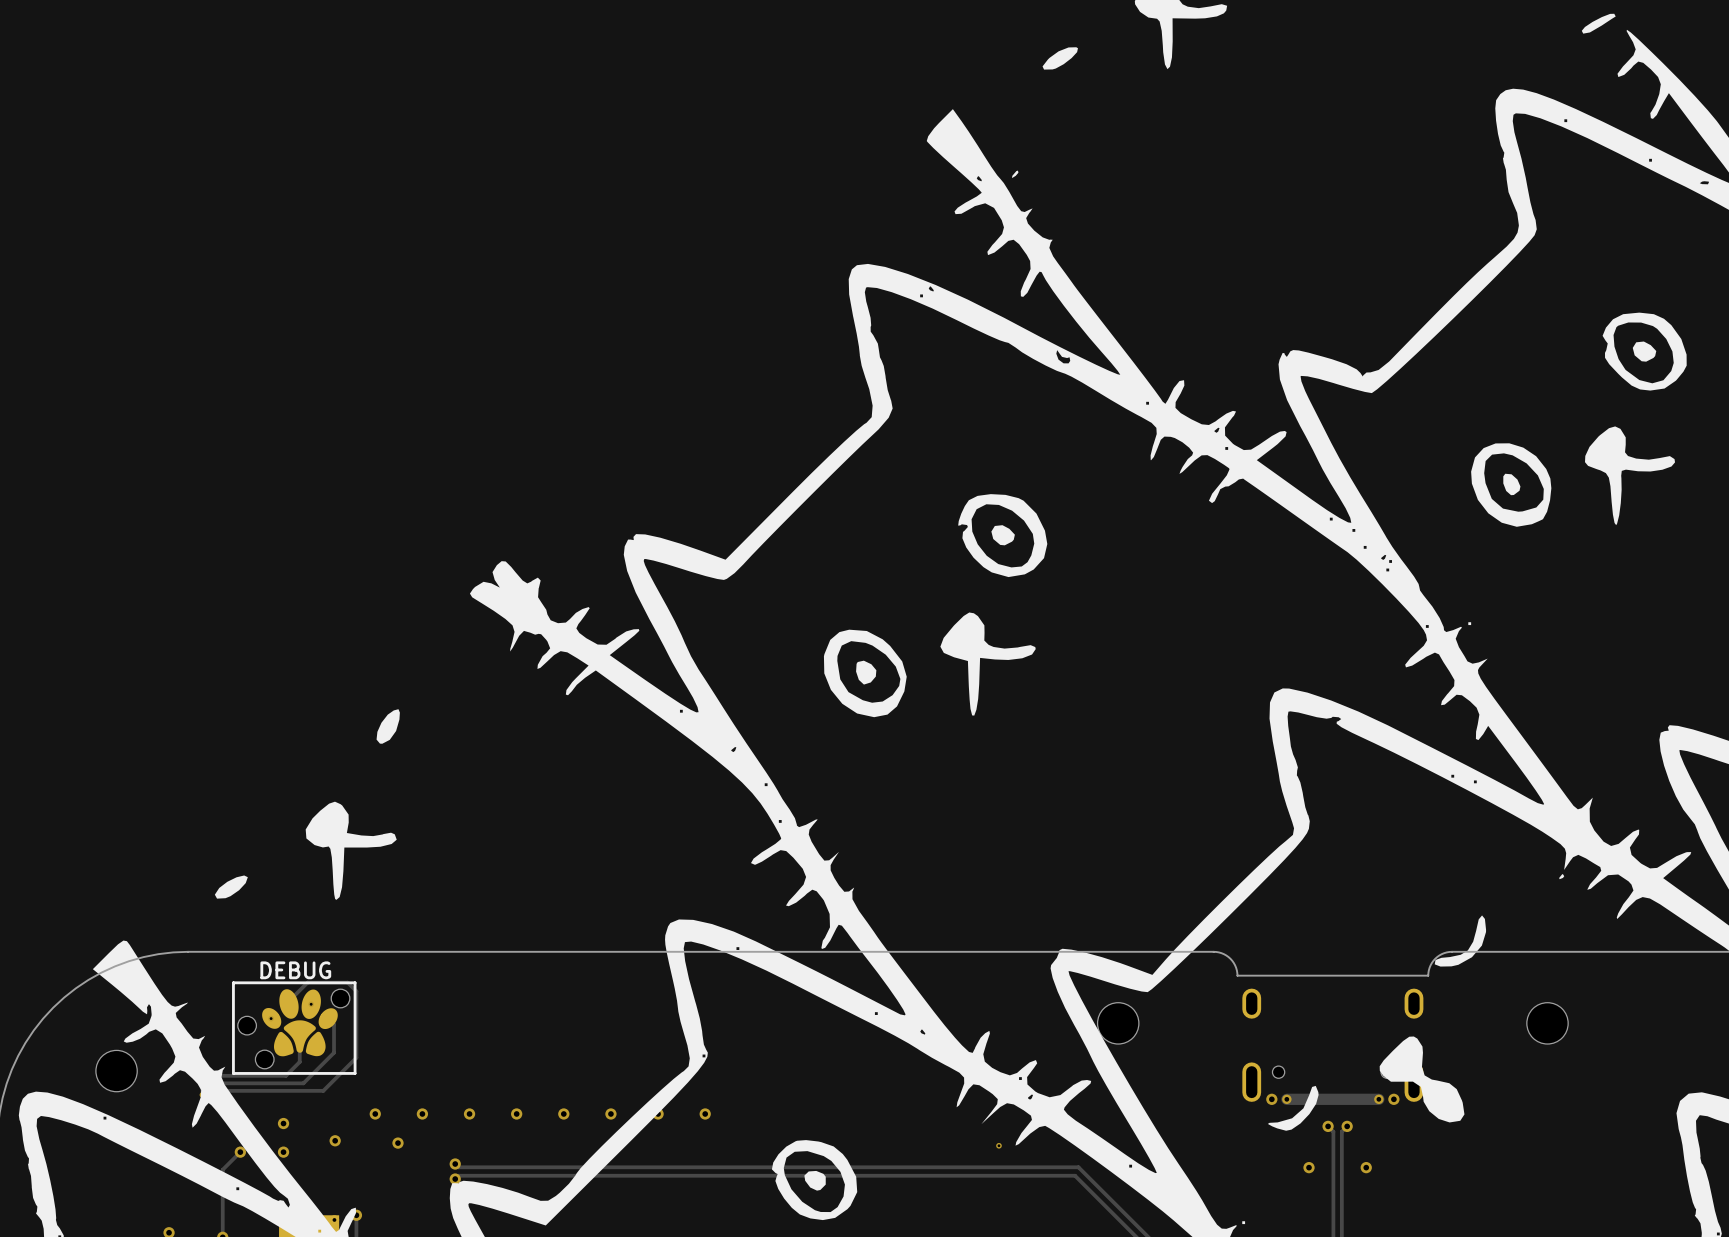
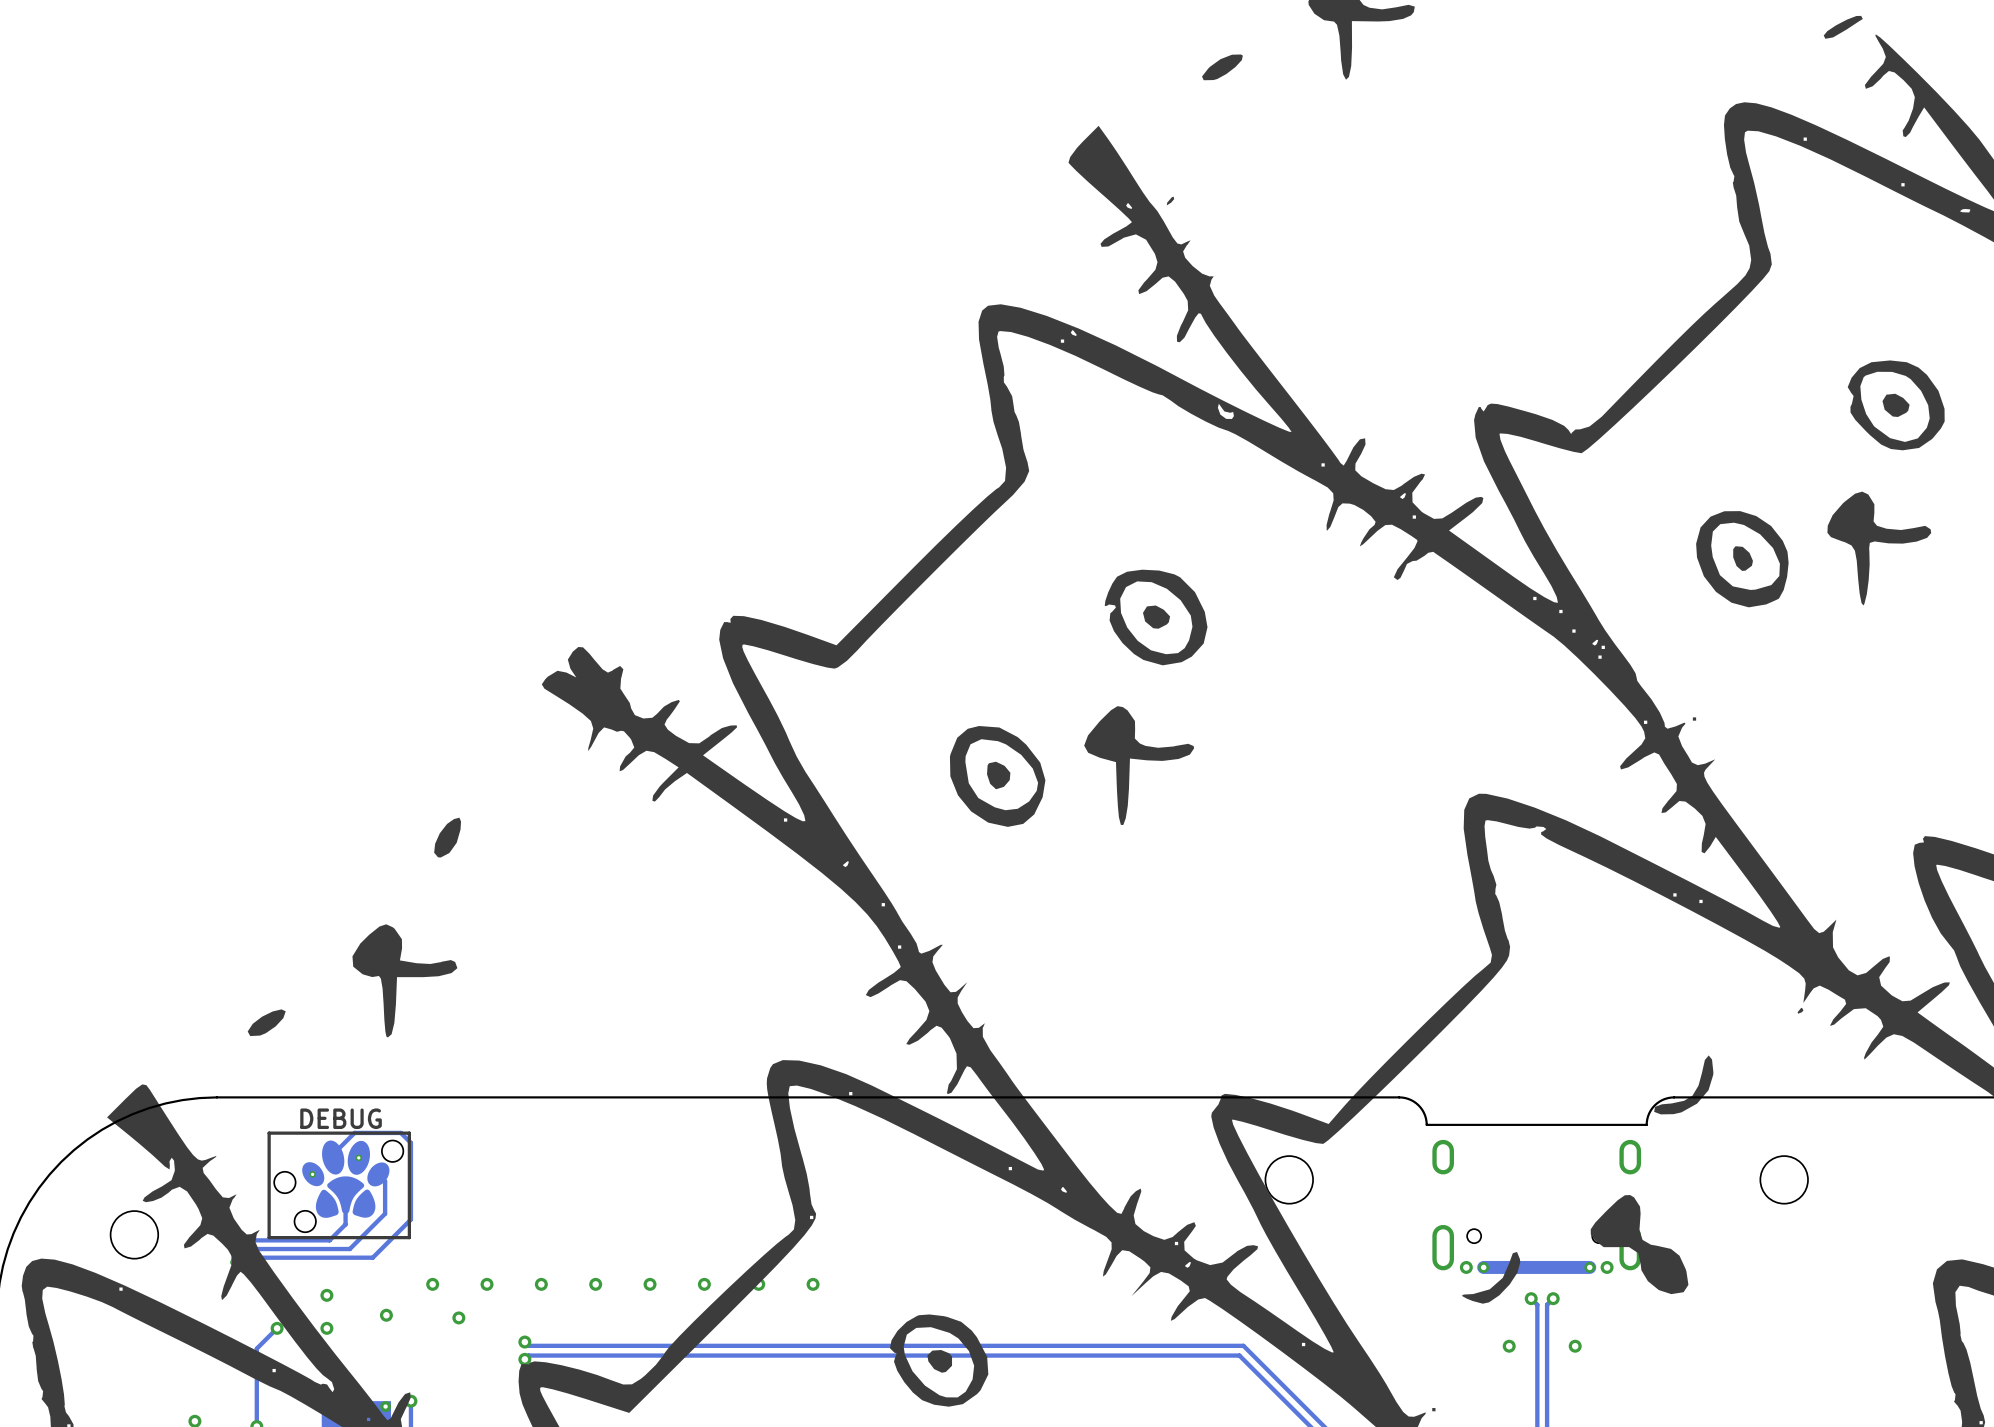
via: (998, 1145) -> none

